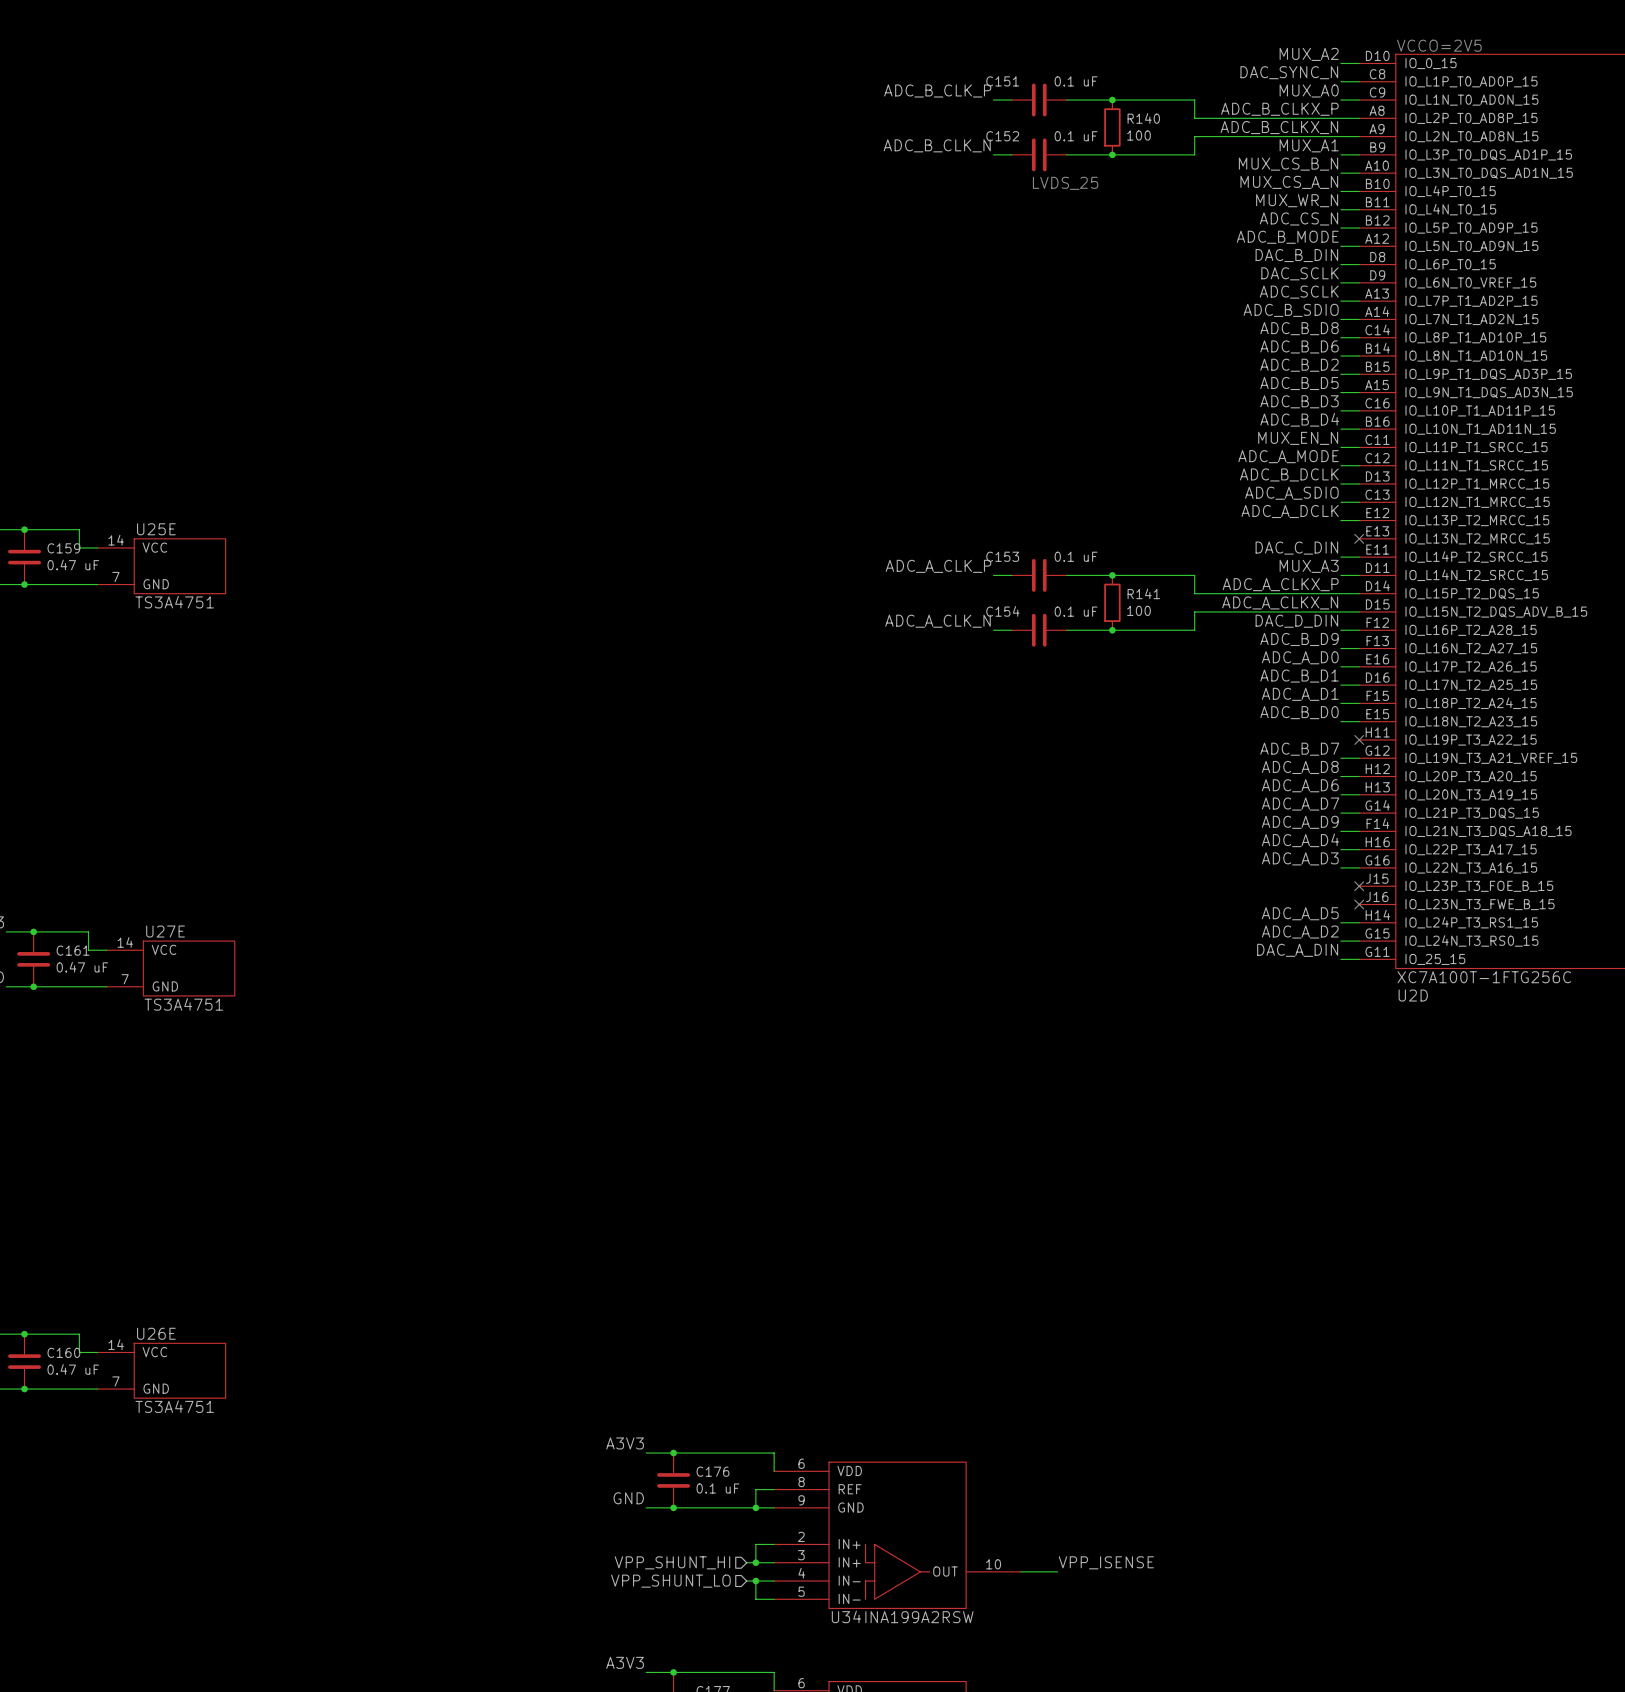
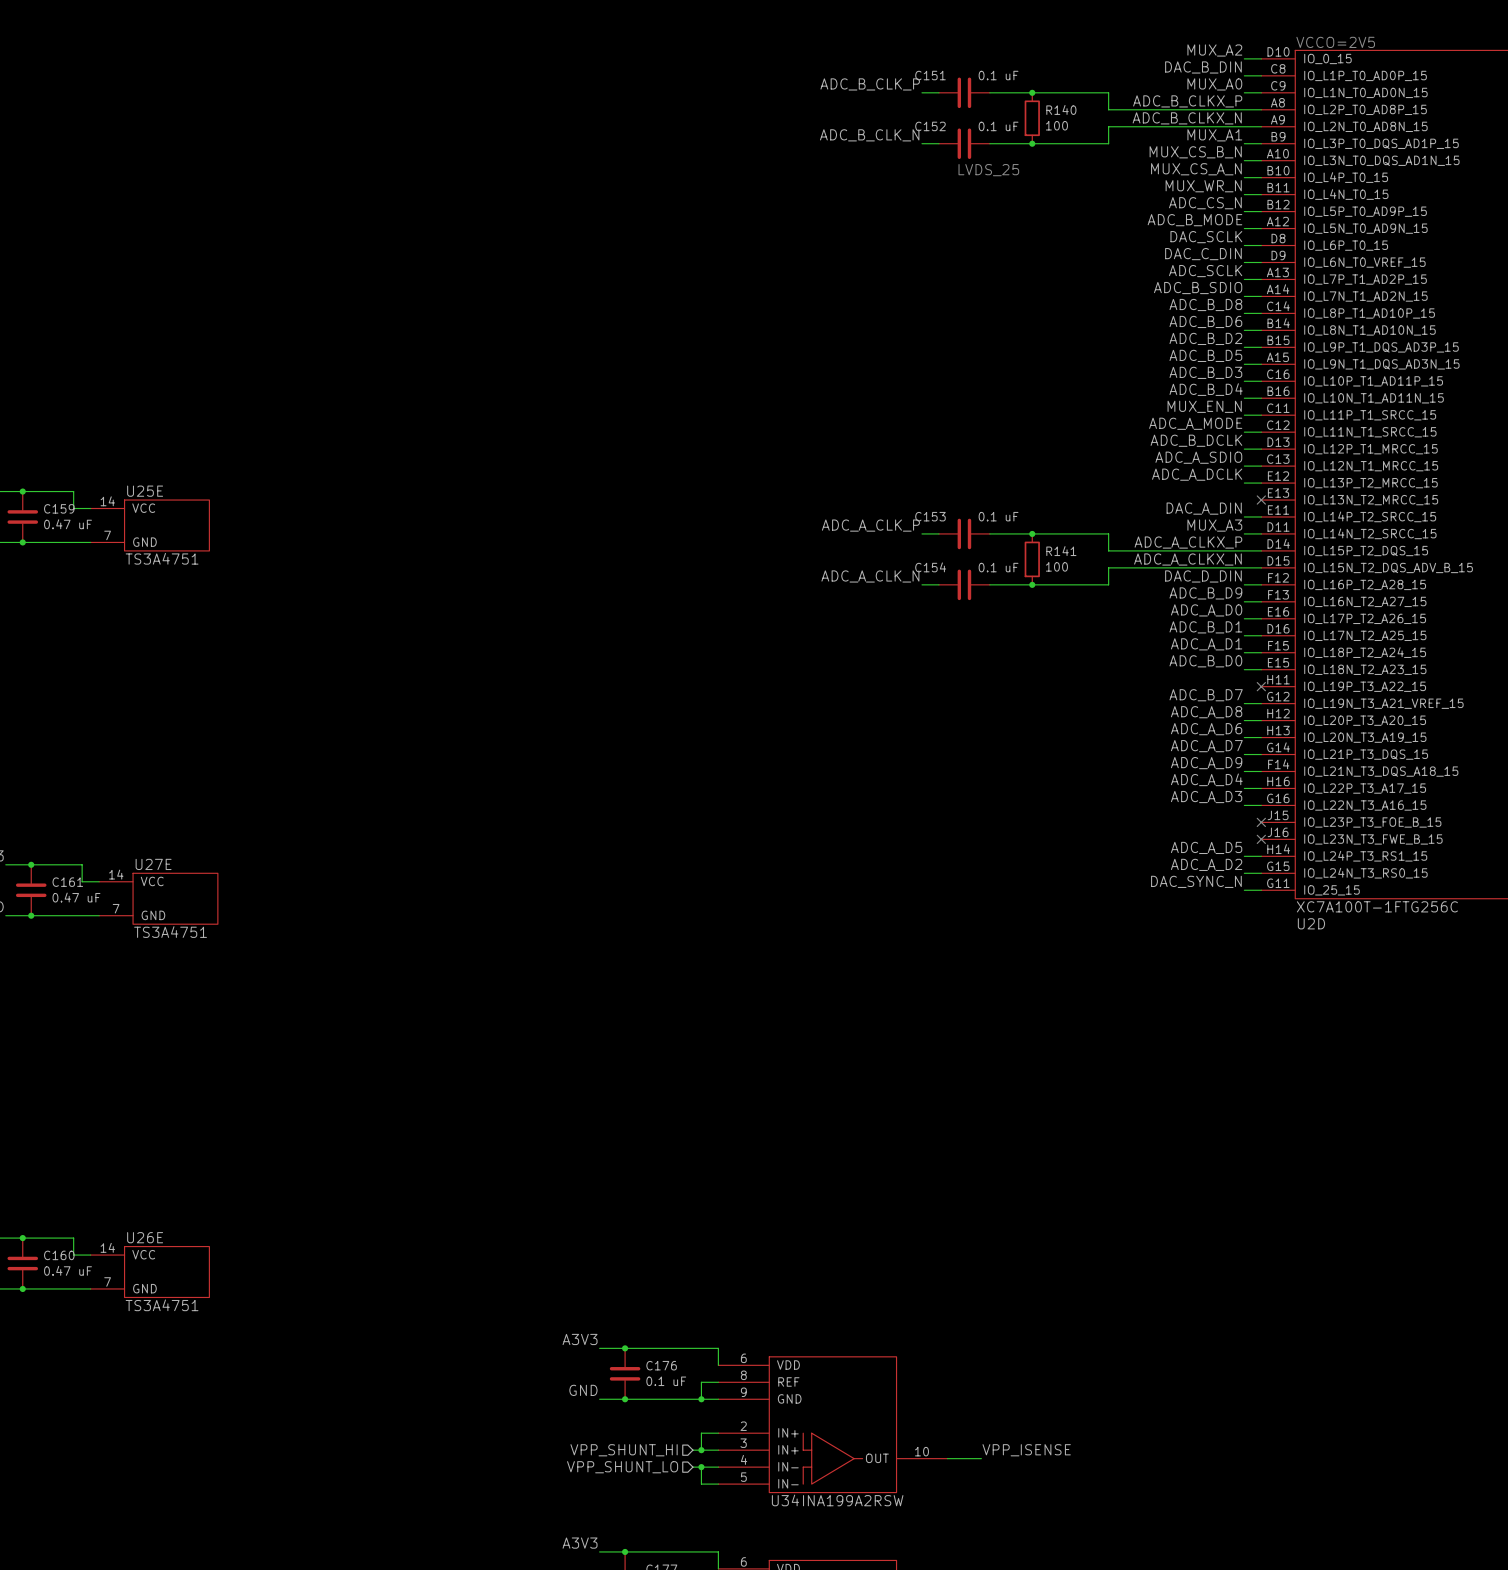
label: DAC_SYNC_N (1289, 72) -> DAC_B_DIN (1203, 67)
label: DAC_B_DIN (1296, 255) -> DAC_SCLK (1206, 237)
label: DAC_SCLK (1300, 273) -> DAC_C_DIN (1203, 254)
label: DAC_C_DIN (1296, 548) -> DAC_A_DIN (1204, 508)
label: DAC_A_DIN (1297, 950) -> DAC_SYNC_N (1196, 881)

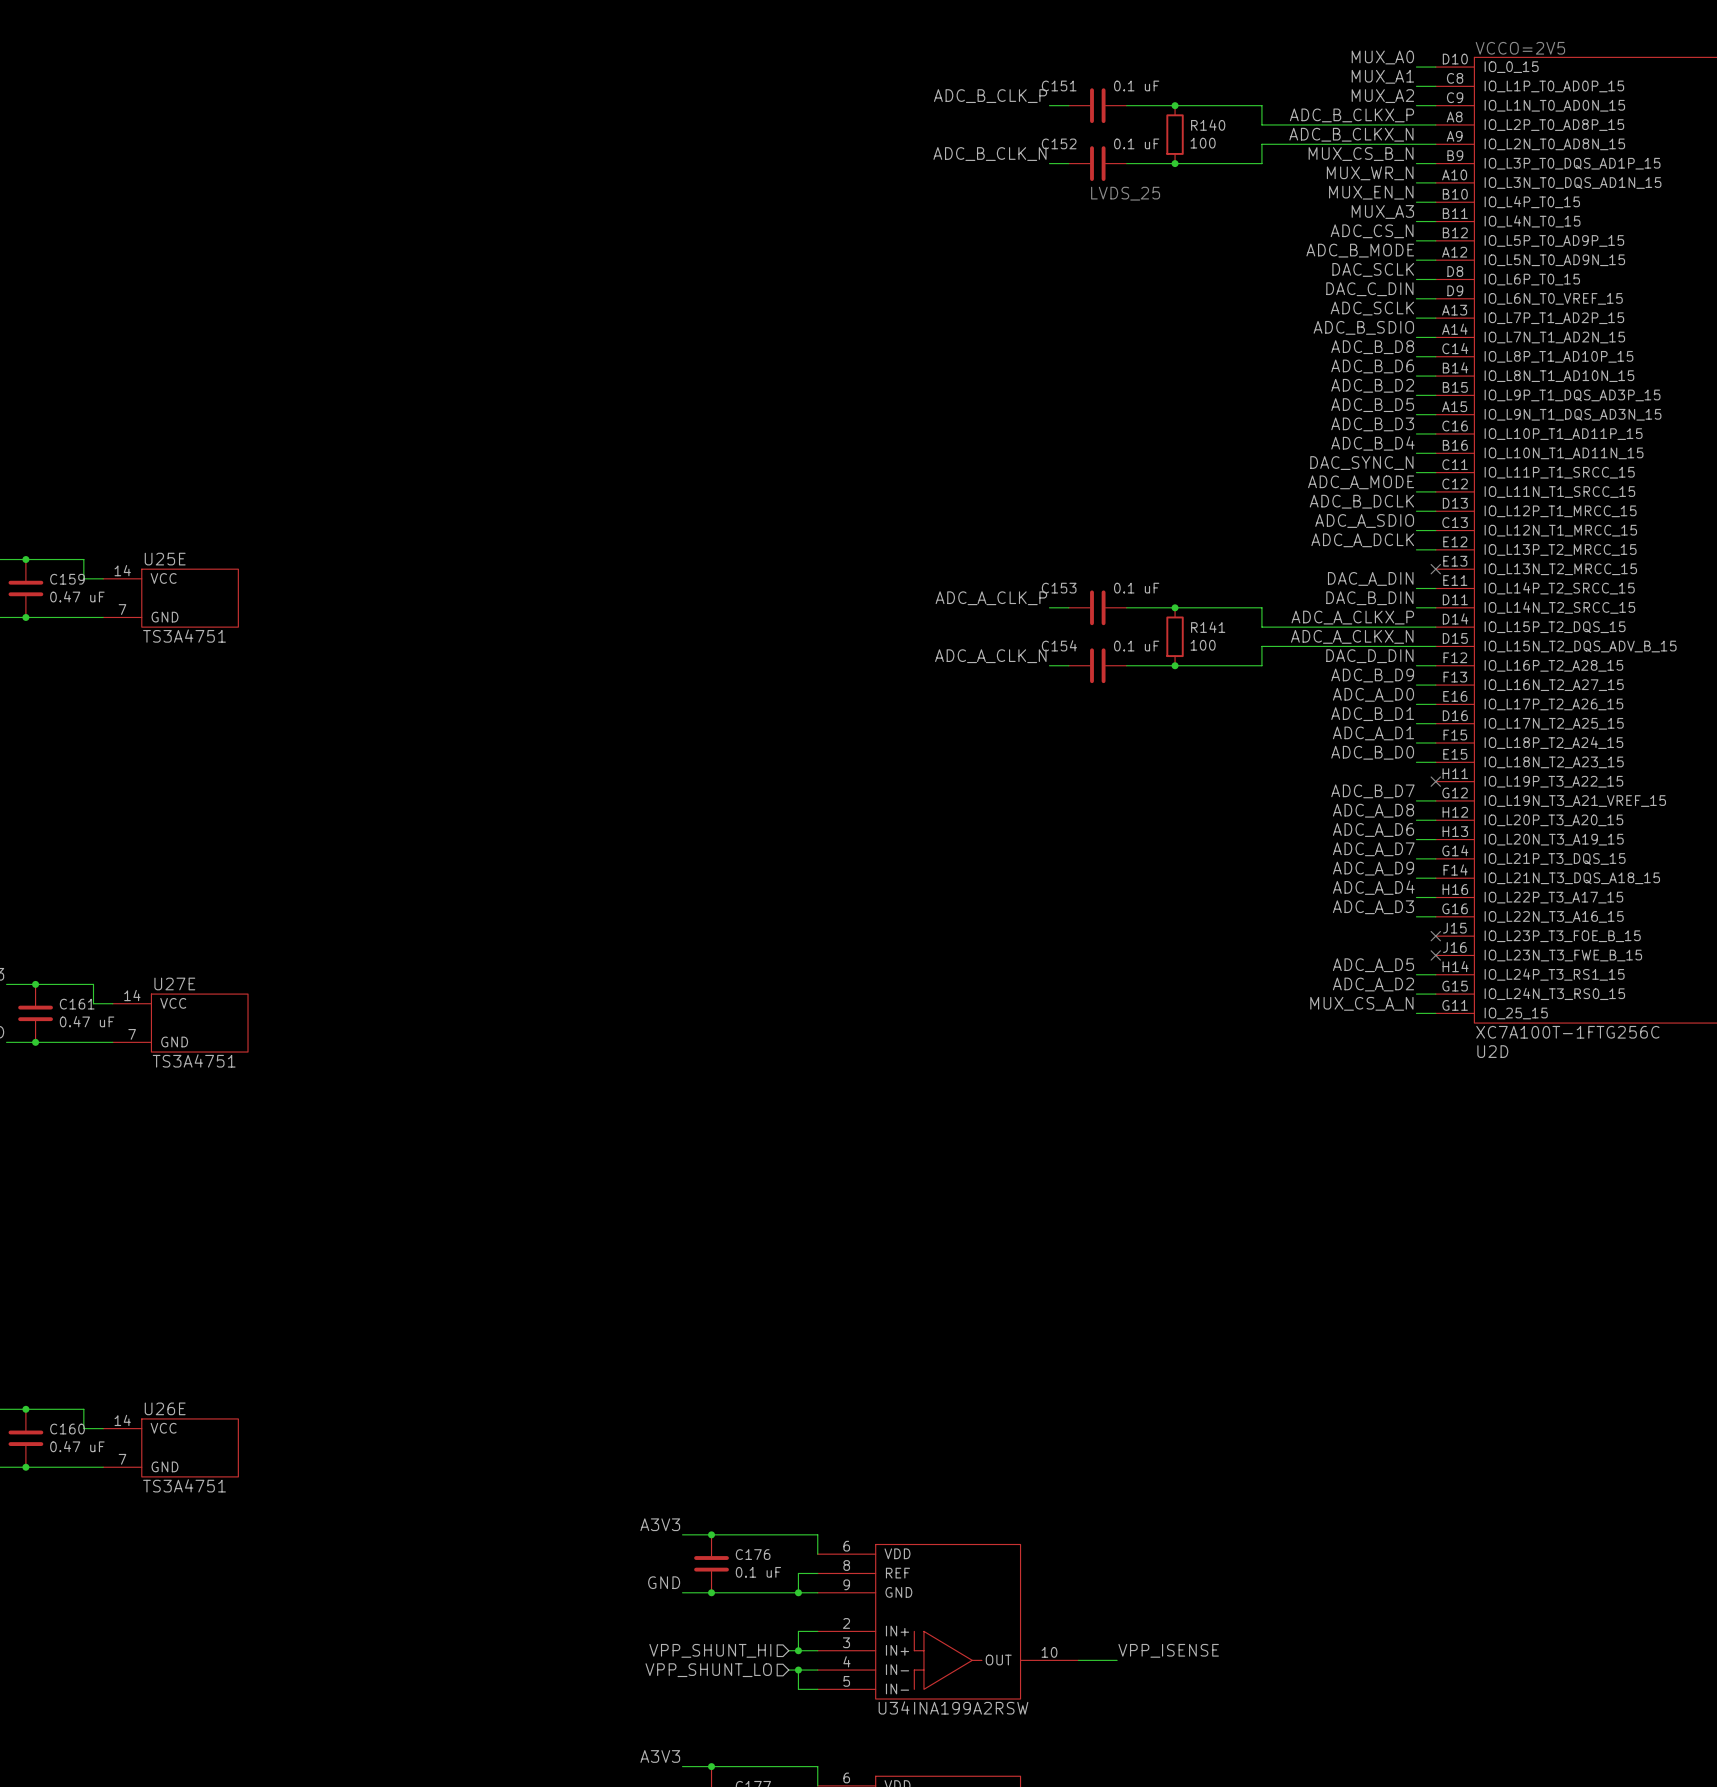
label: MUX_A2 (1214, 50) -> MUX_A0 (1382, 57)
label: DAC_B_DIN (1203, 67) -> MUX_A1 (1382, 76)
label: MUX_A0 (1214, 84) -> MUX_A2 (1382, 96)
label: MUX_A1 (1214, 135) -> MUX_CS_B_N (1361, 154)
label: MUX_CS_B_N (1195, 152) -> MUX_WR_N (1370, 173)
label: MUX_CS_A_N (1196, 169) -> MUX_EN_N (1371, 192)
label: MUX_WR_N (1203, 186) -> MUX_A3 (1382, 211)
label: MUX_EN_N (1204, 406) -> DAC_SYNC_N (1361, 463)
label: MUX_A3 (1214, 525) -> DAC_B_DIN (1369, 598)
label: DAC_SYNC_N (1196, 881) -> MUX_CS_A_N (1361, 1003)

